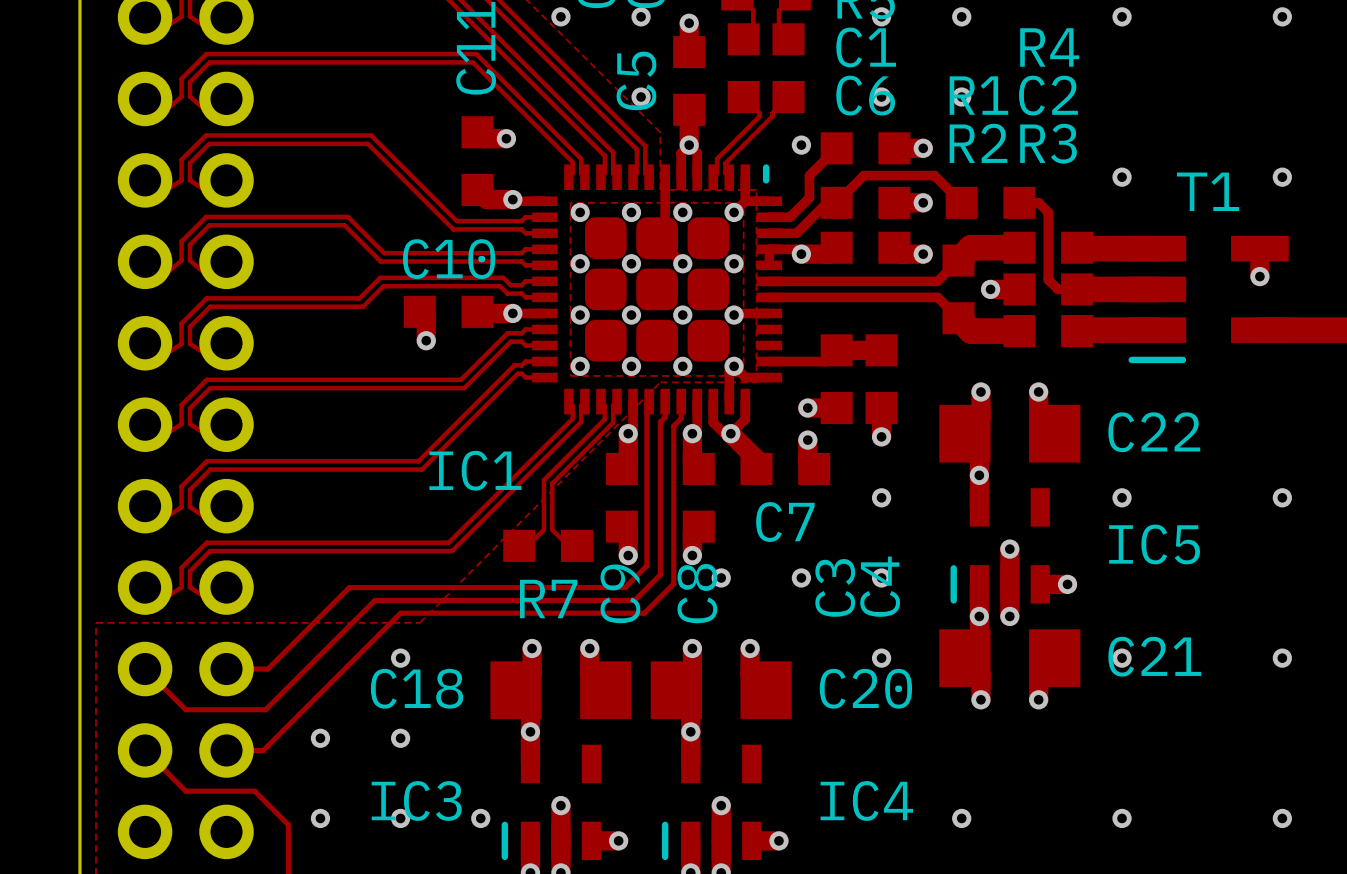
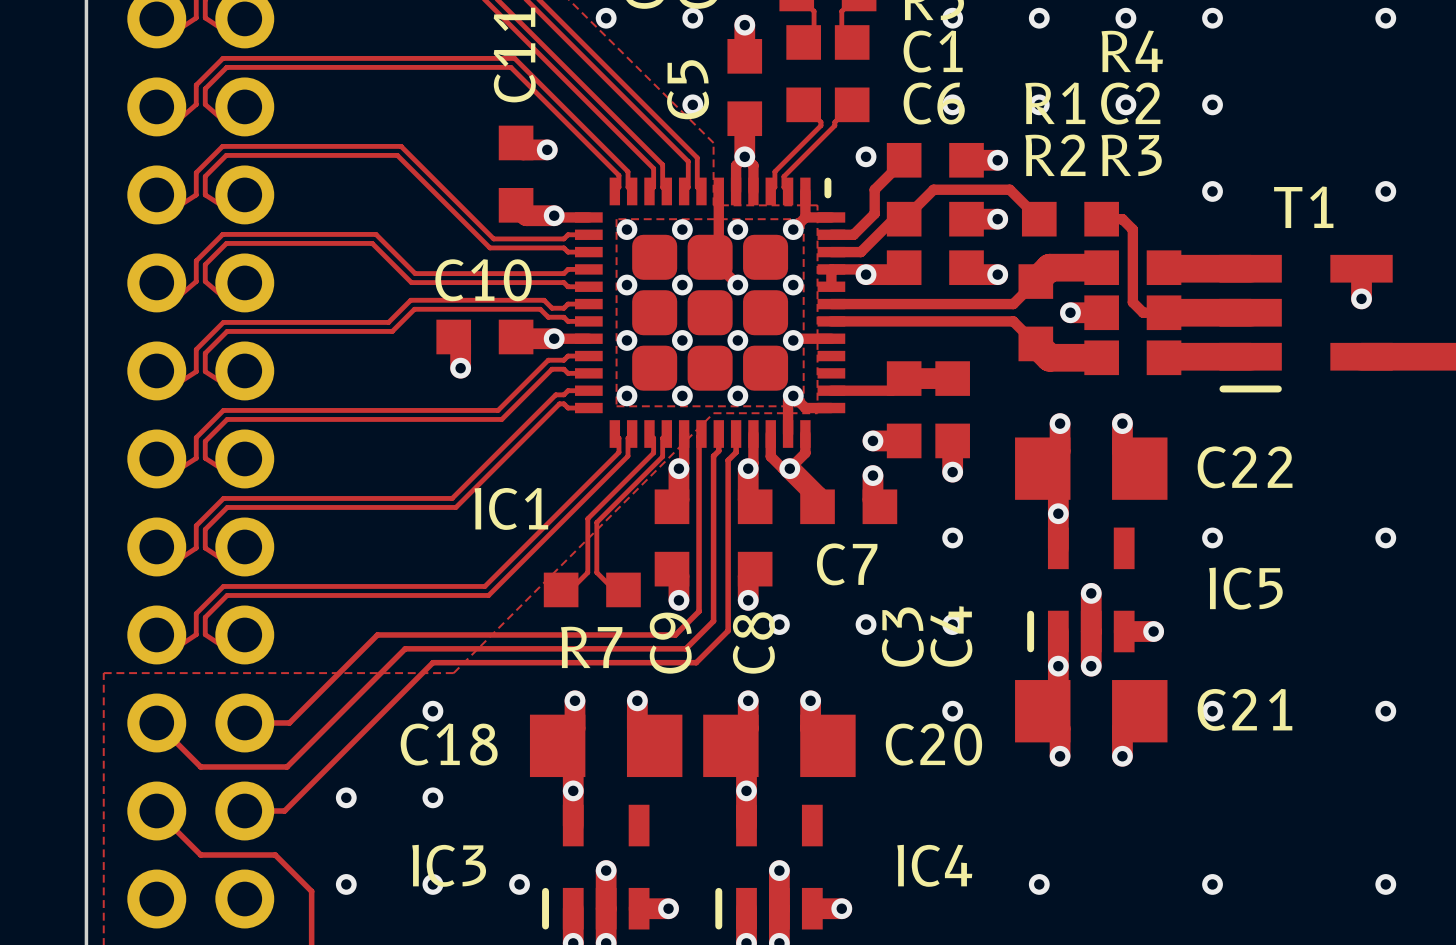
via: none -> (1125, 18)
via: none -> (1125, 104)
via: none -> (1212, 104)

